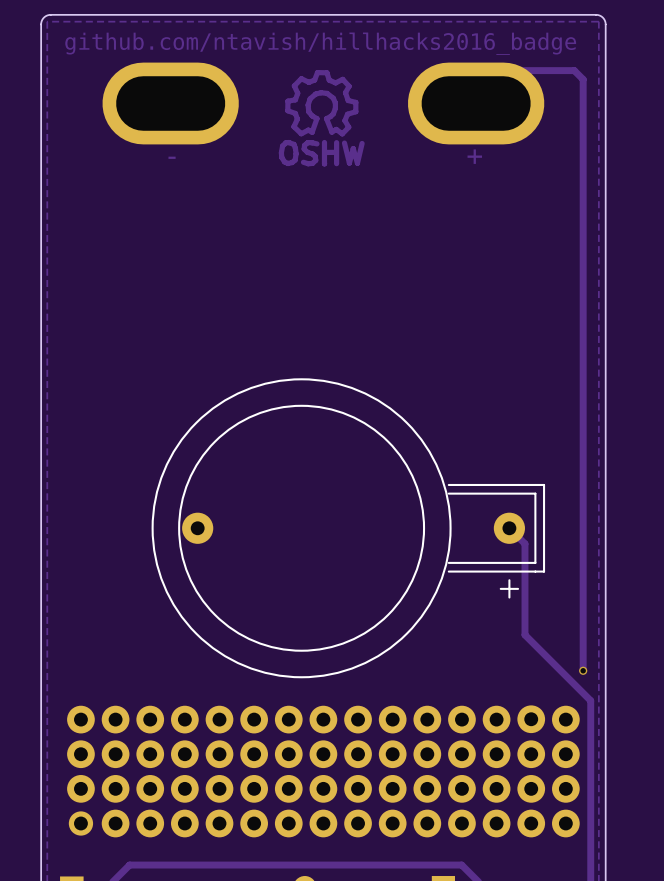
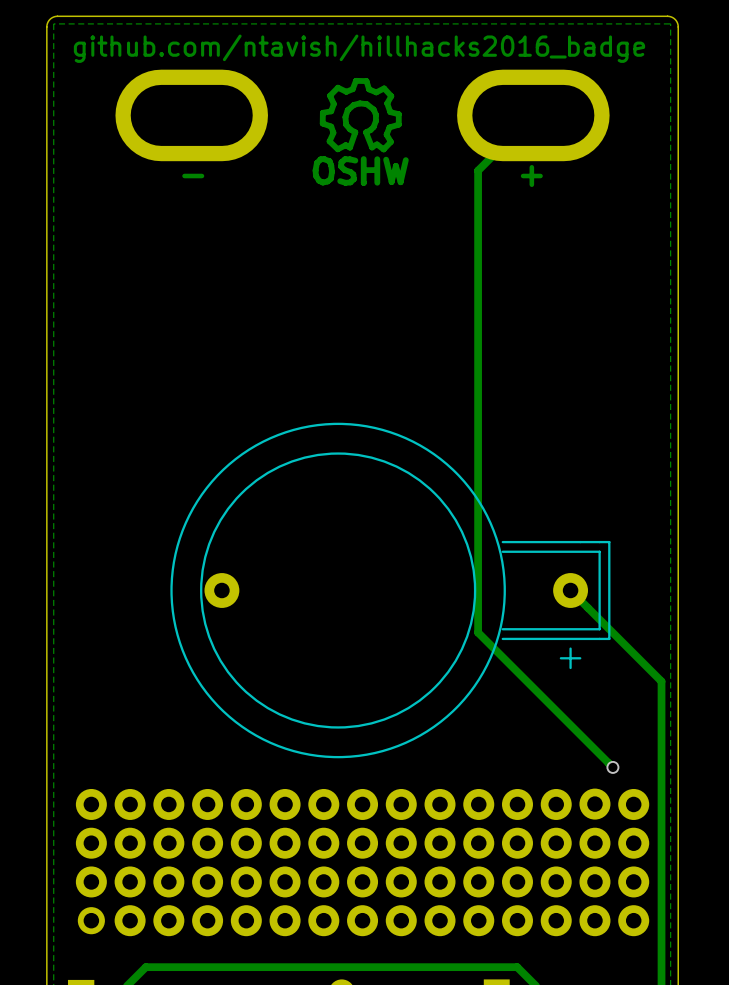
track: (476, 103) (509, 70) (574, 70) (583, 79) (583, 670) -> (533, 115) (478, 170) (478, 632) (612, 767)
track: (524, 543) (524, 634) (590, 700) -> (588, 607) (661, 681) (661, 783)
via: (583, 670) -> none
via: none -> (612, 767)

